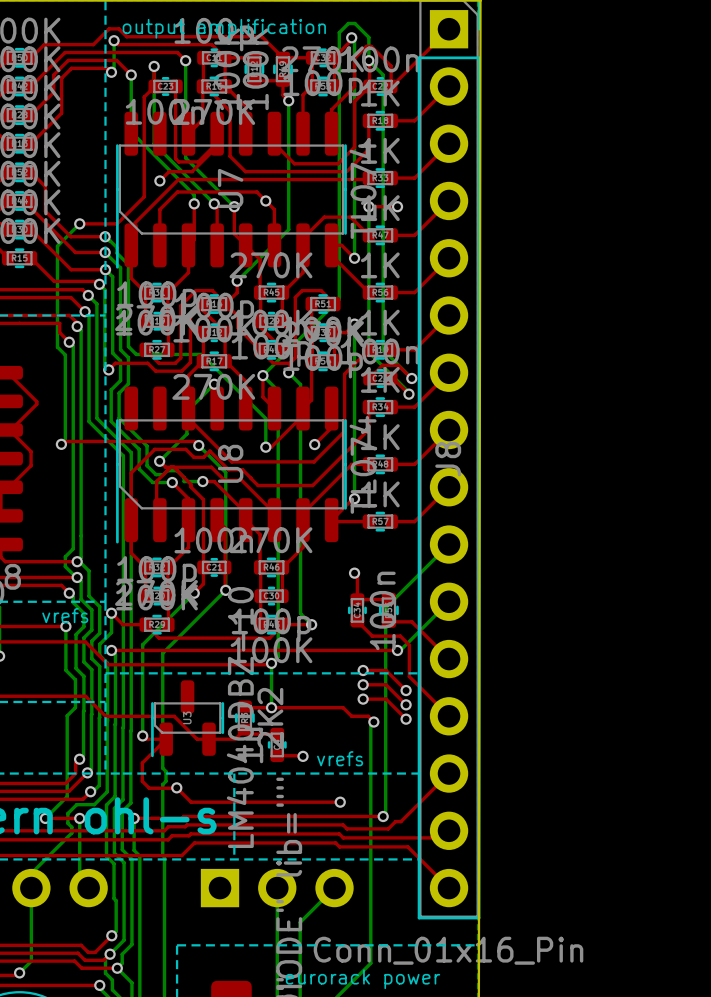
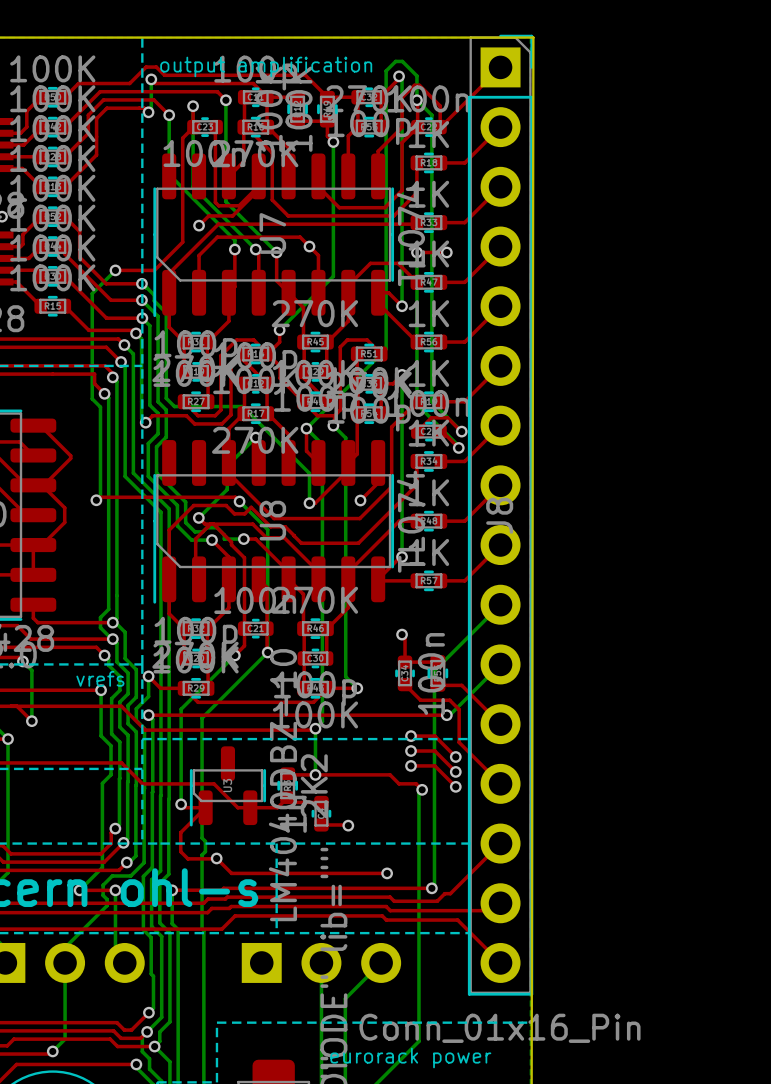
text: vrefs (340, 758) -> none

